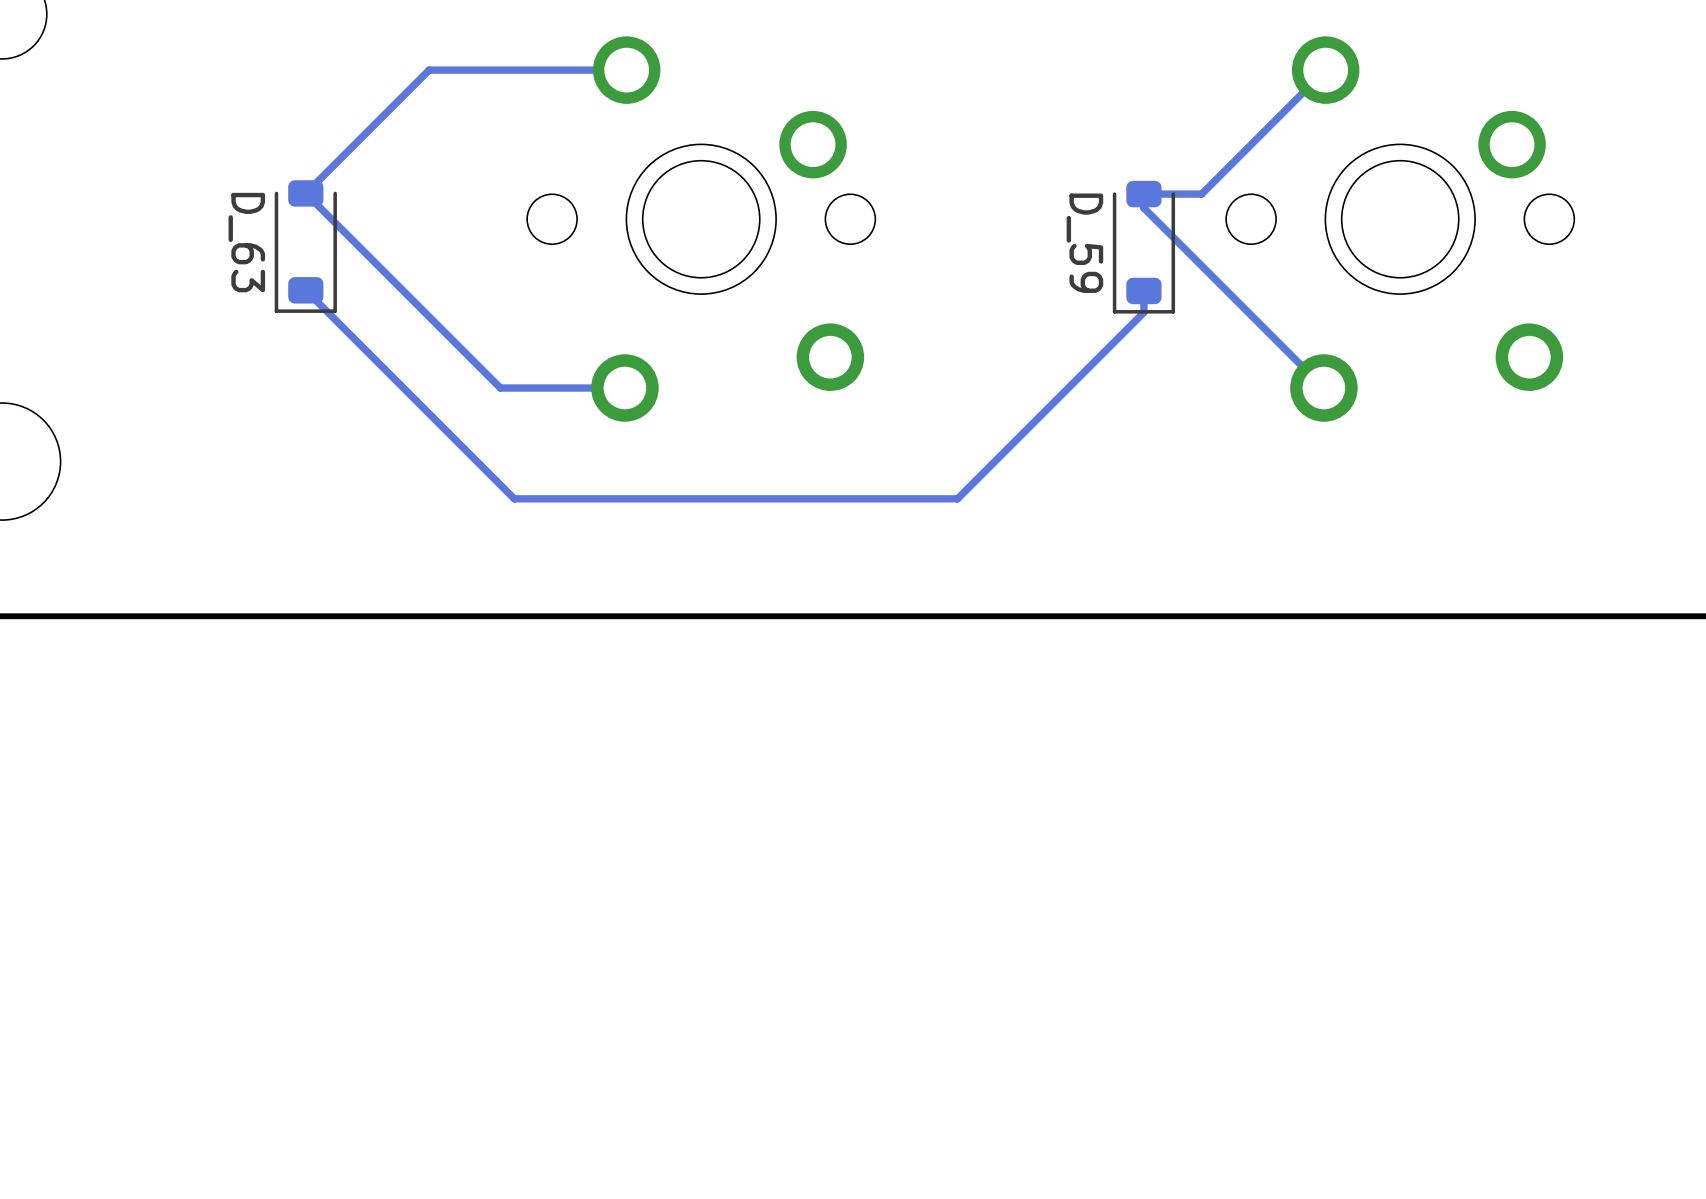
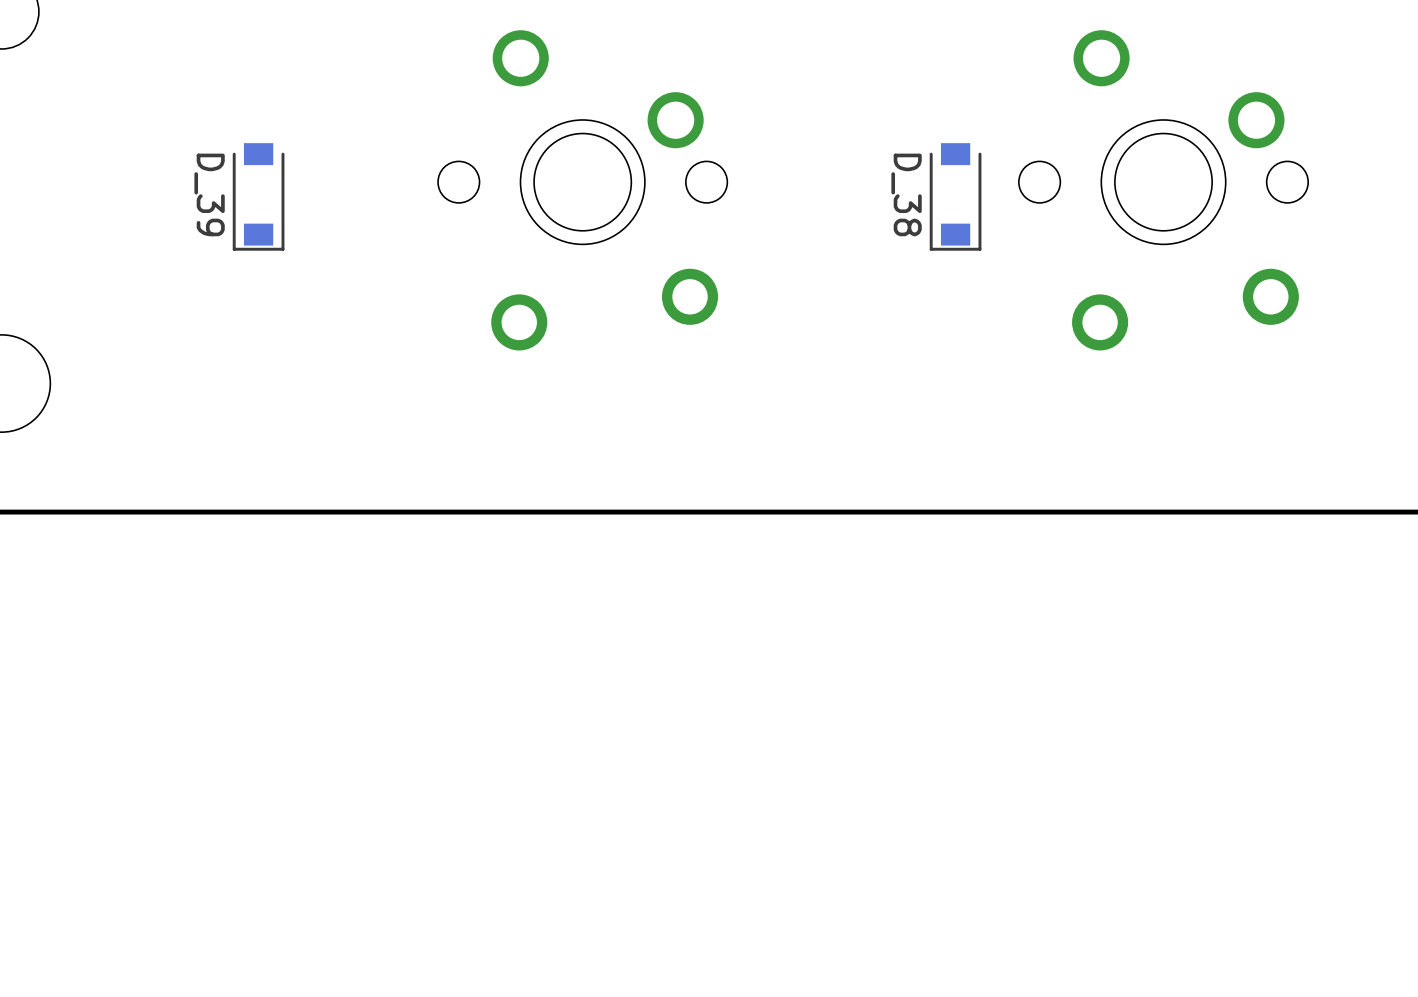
track: (626, 70) (429, 70) (305, 193) (500, 388) (624, 388) -> none
track: (1325, 70) (1201, 194) (1143, 194) (1143, 208) (1323, 388) -> none
D_39: none -> (258, 196)
D_38: none -> (955, 196)
D_63: (305, 246) -> none
D_59: (1143, 247) -> none
track: (305, 290) (514, 498) (957, 498) (1143, 312) (1143, 290) -> none

